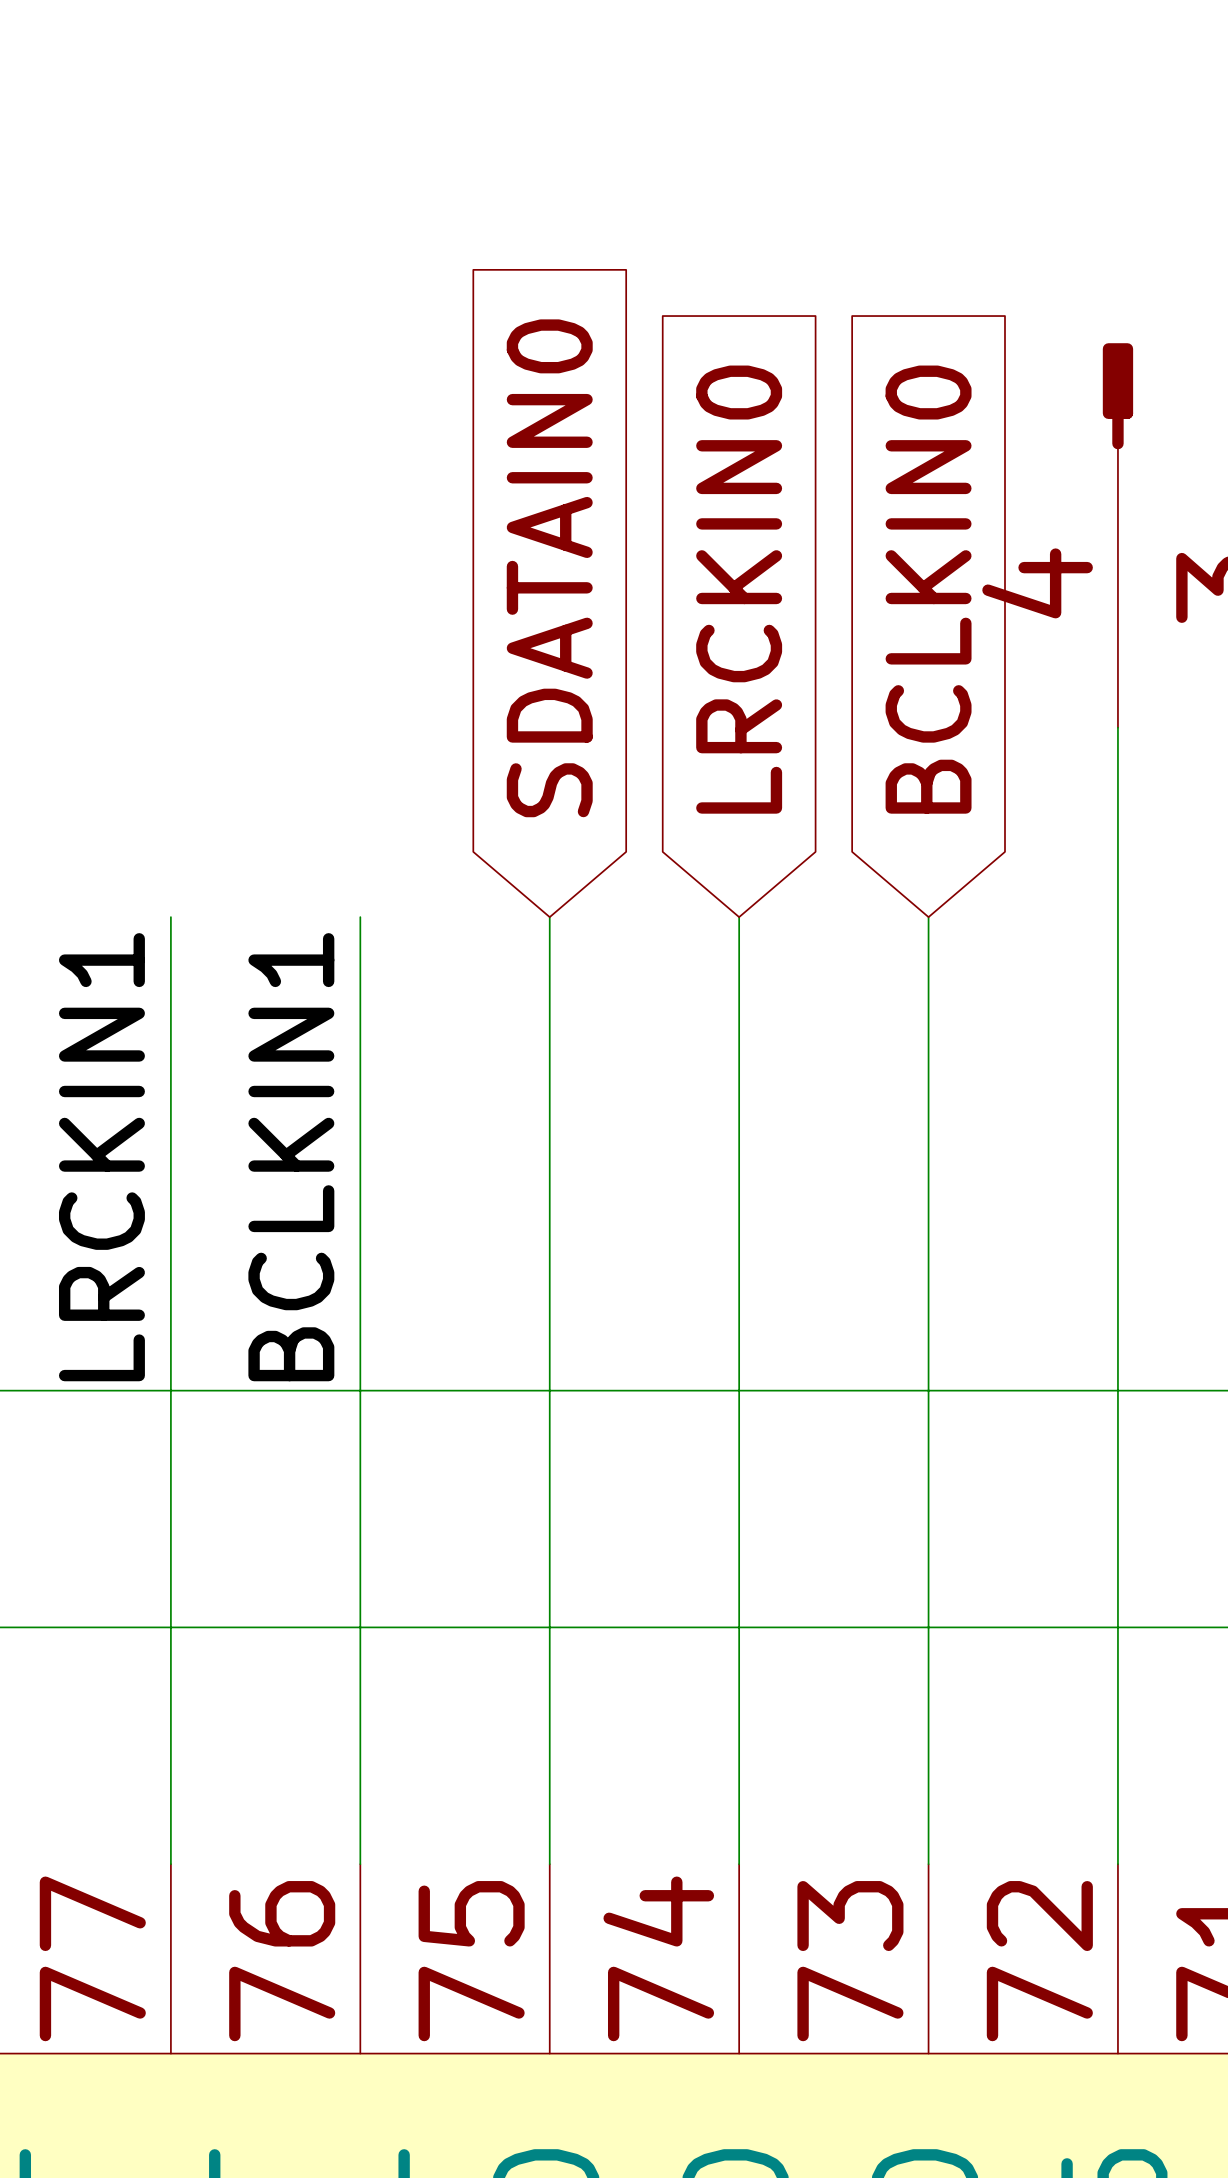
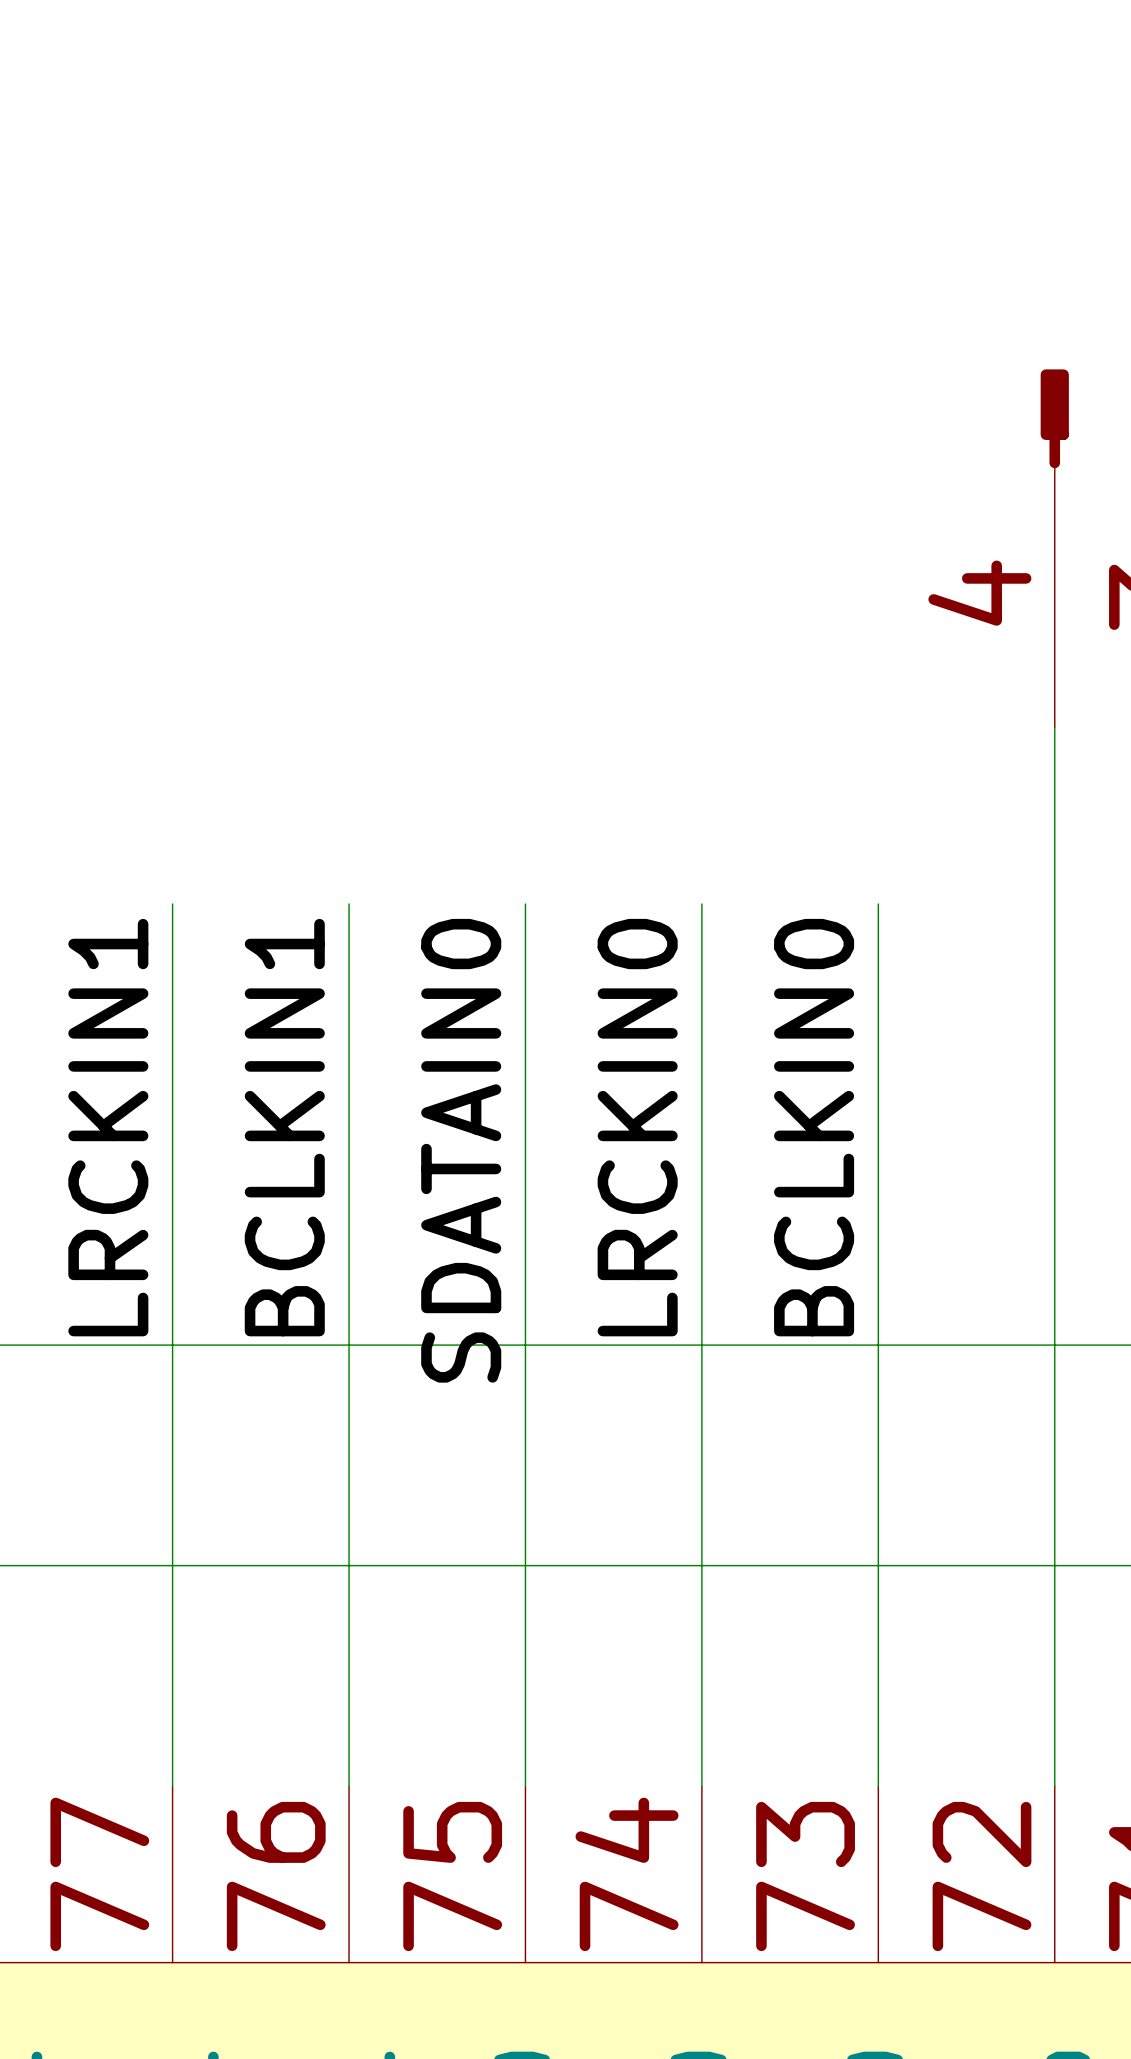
global label: SDATAIN0 (549, 568) -> none
global label: LRCKIN0 (739, 589) -> none
global label: BCLKIN0 (928, 589) -> none
label: none -> LRCKIN0 (637, 1127)
label: none -> BCLKIN0 (814, 1127)
label: none -> SDATAIN0 (461, 1150)

